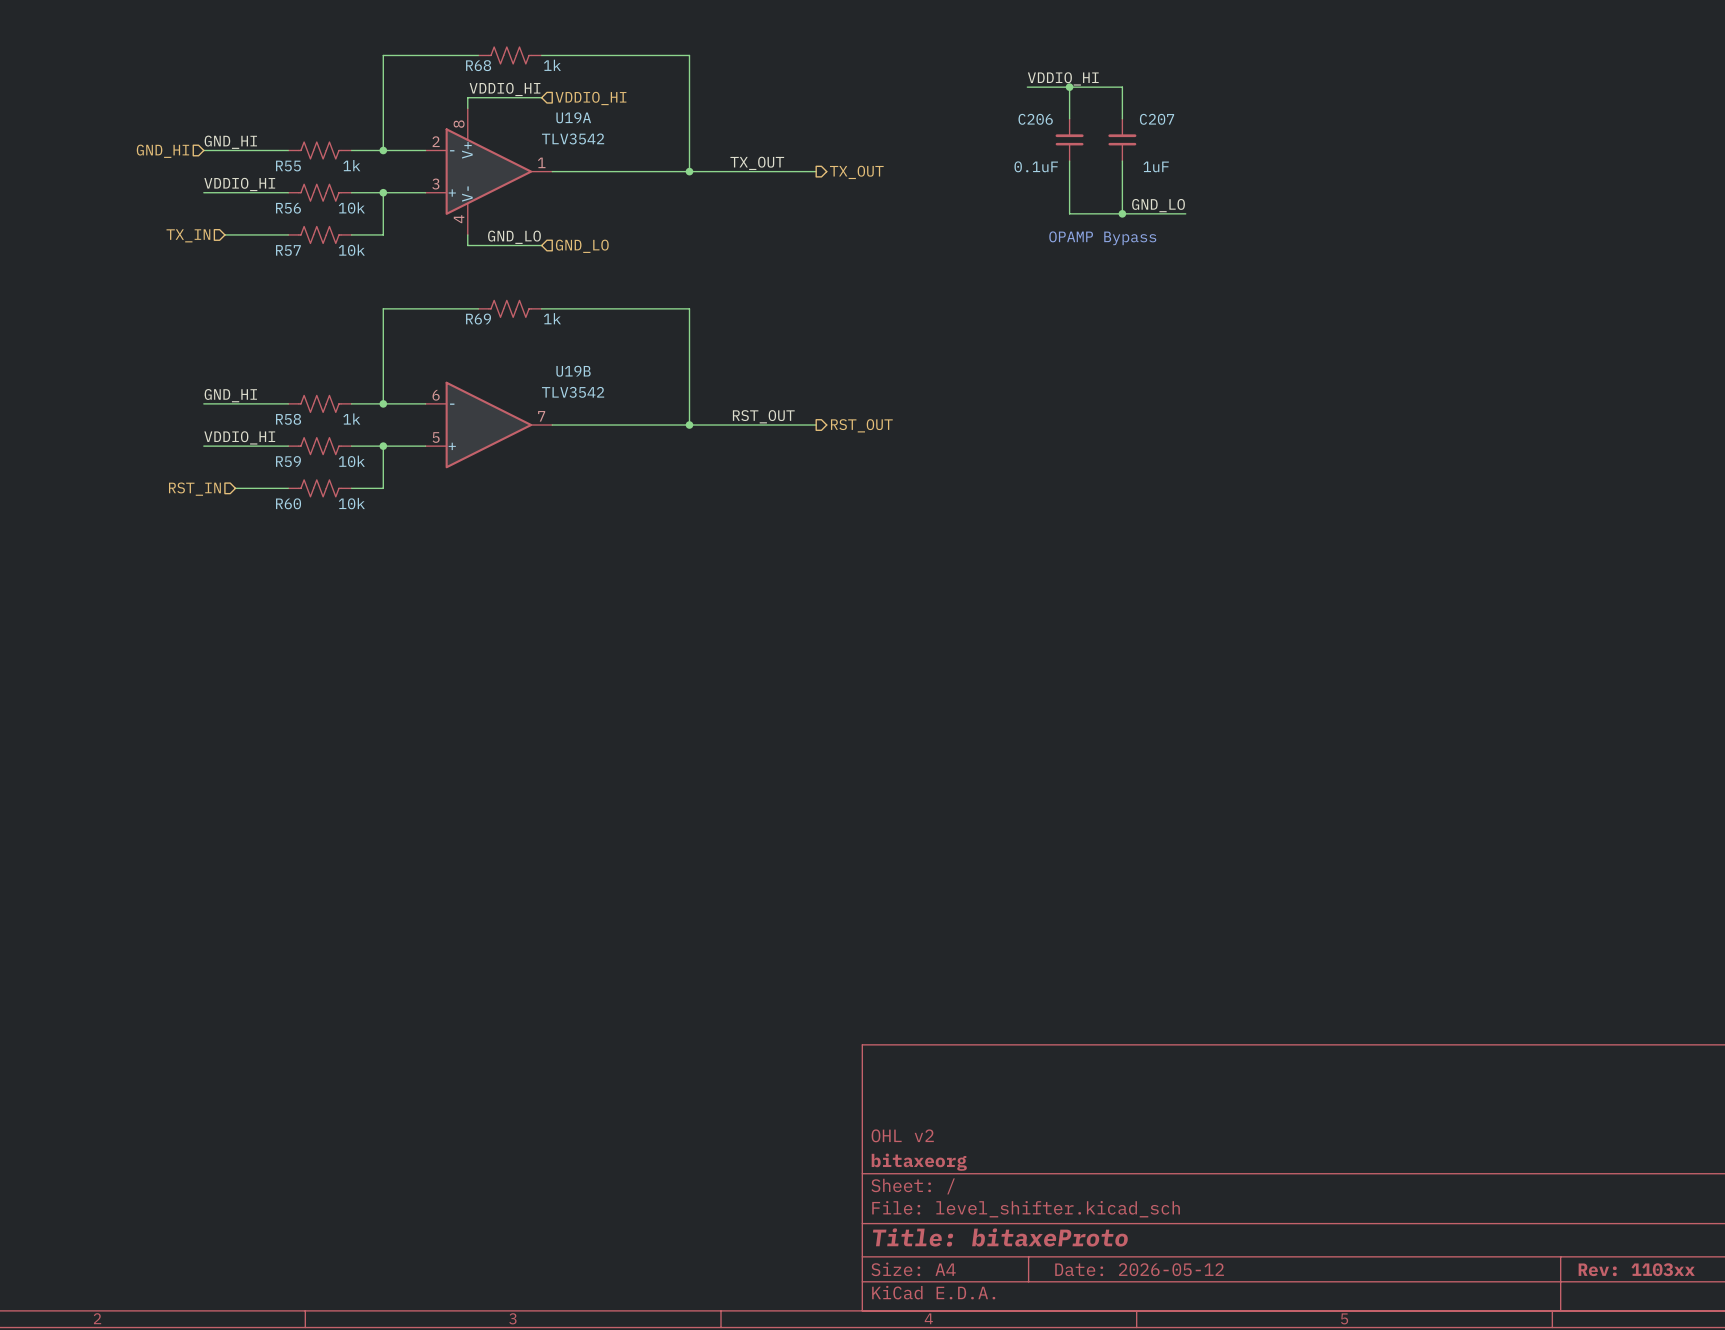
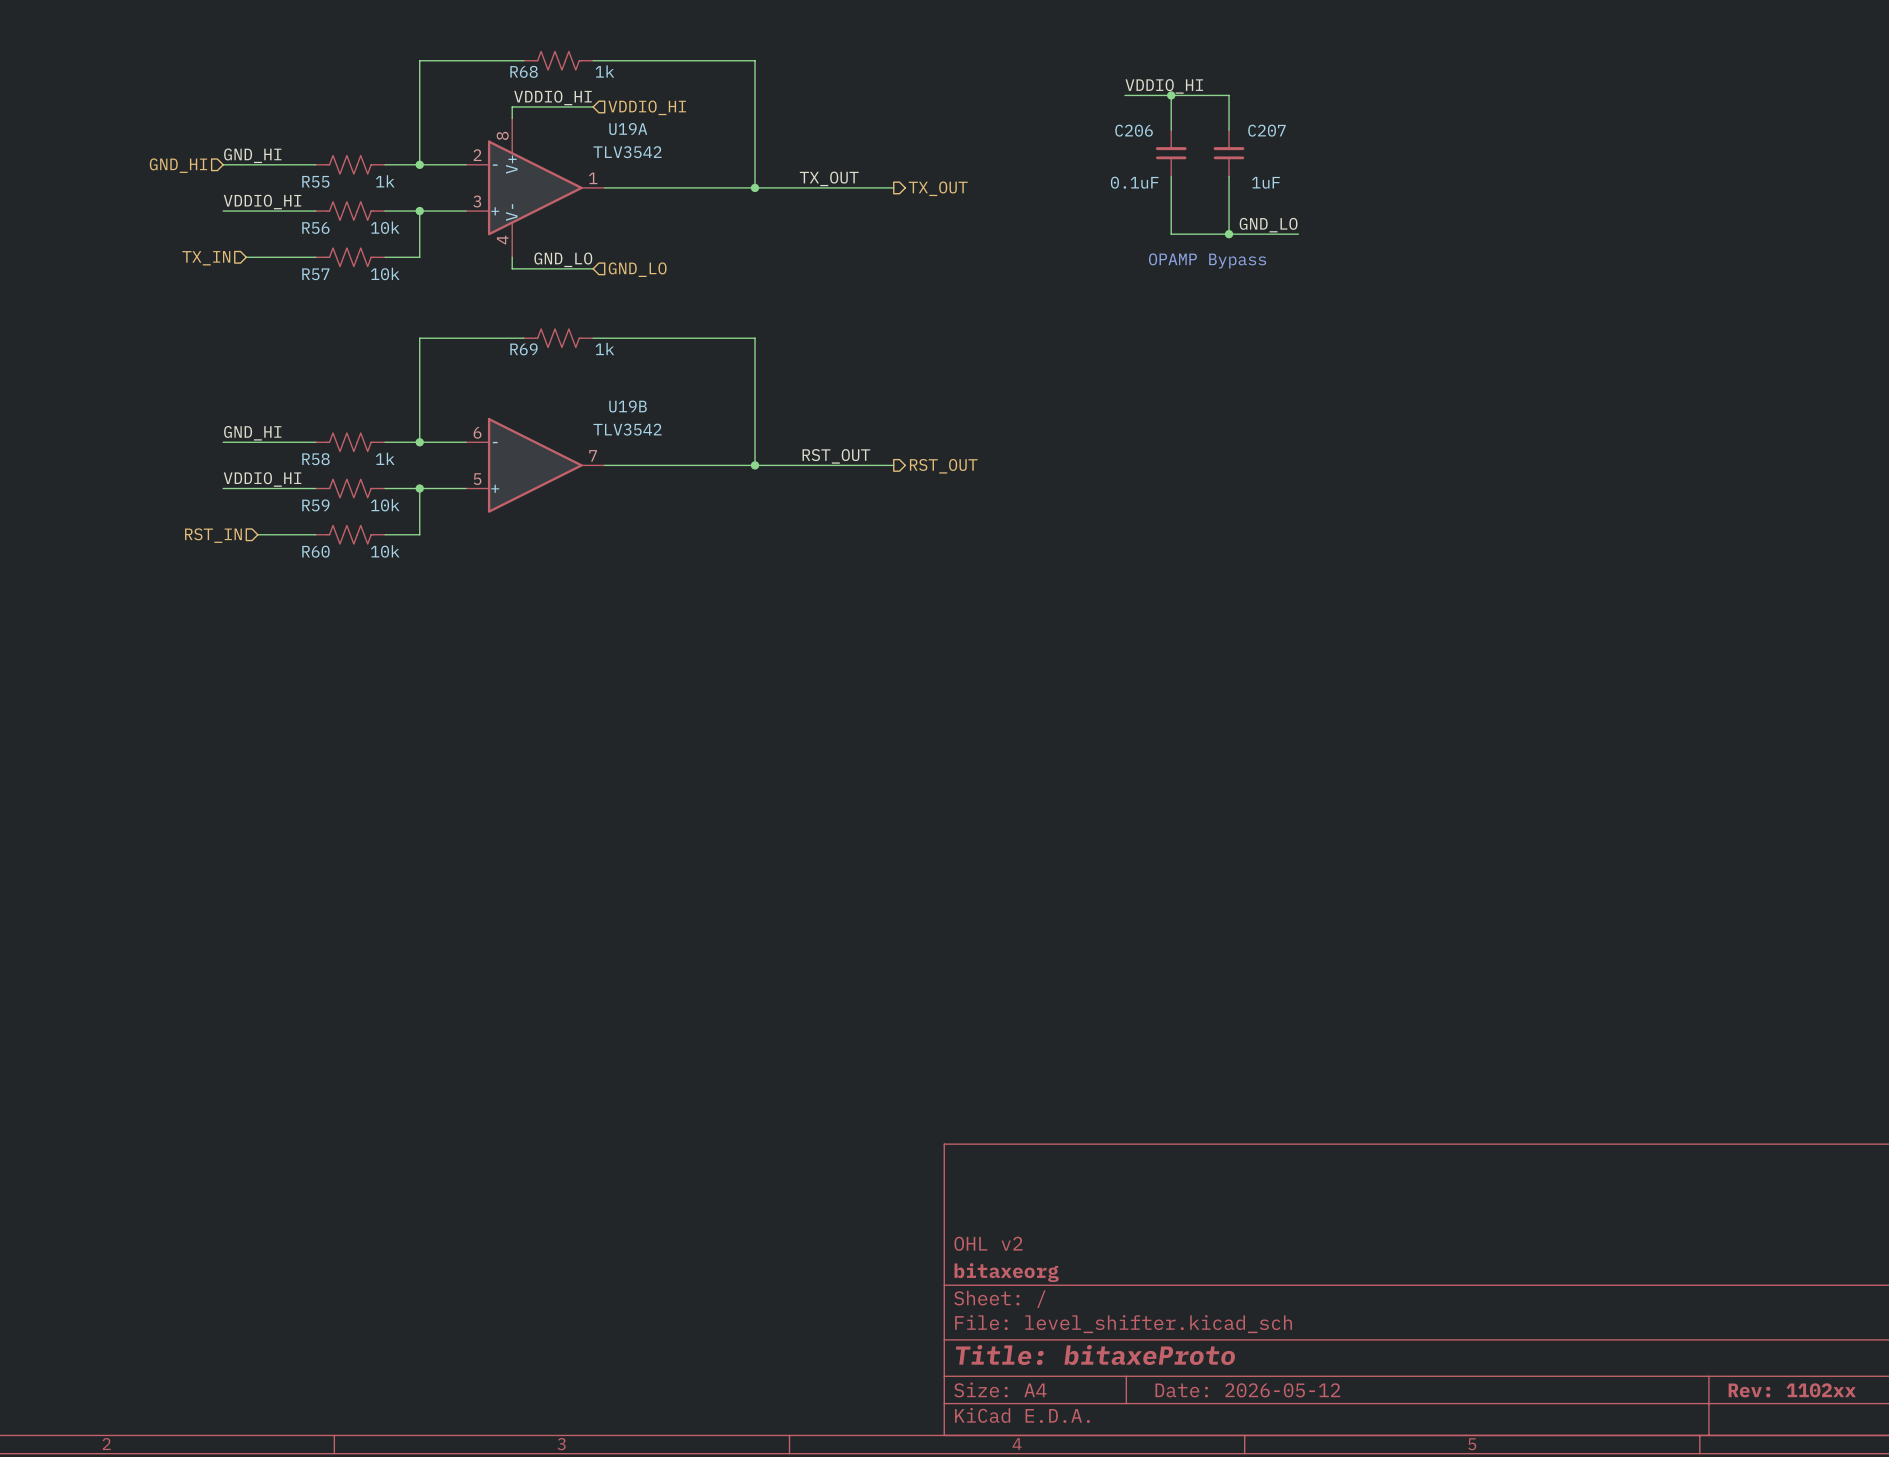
title block: Rev: 1103xx (1636, 1269) -> Rev: 1102xx (1792, 1390)

